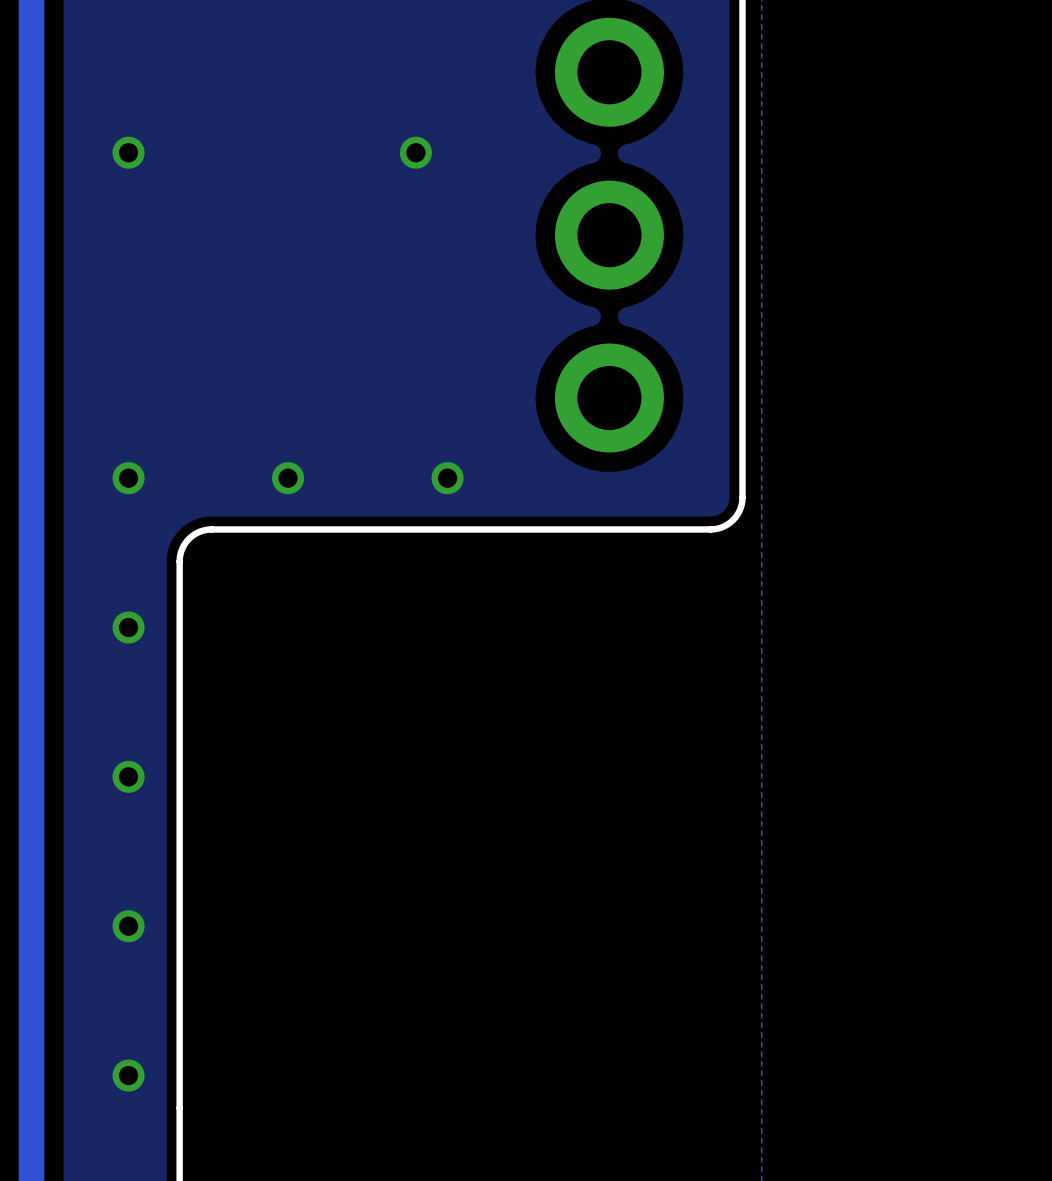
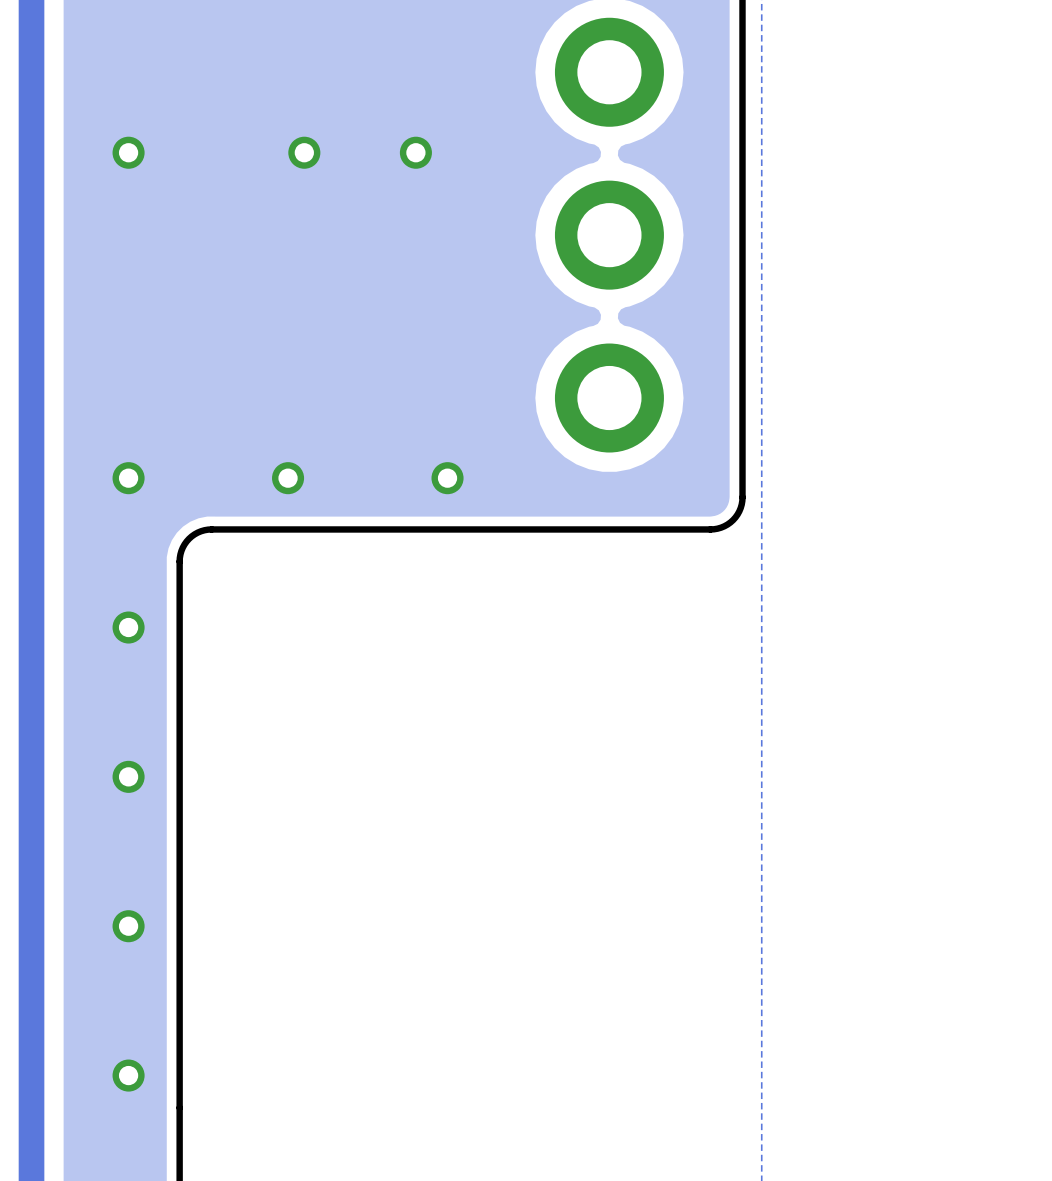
via: none -> (304, 152)

